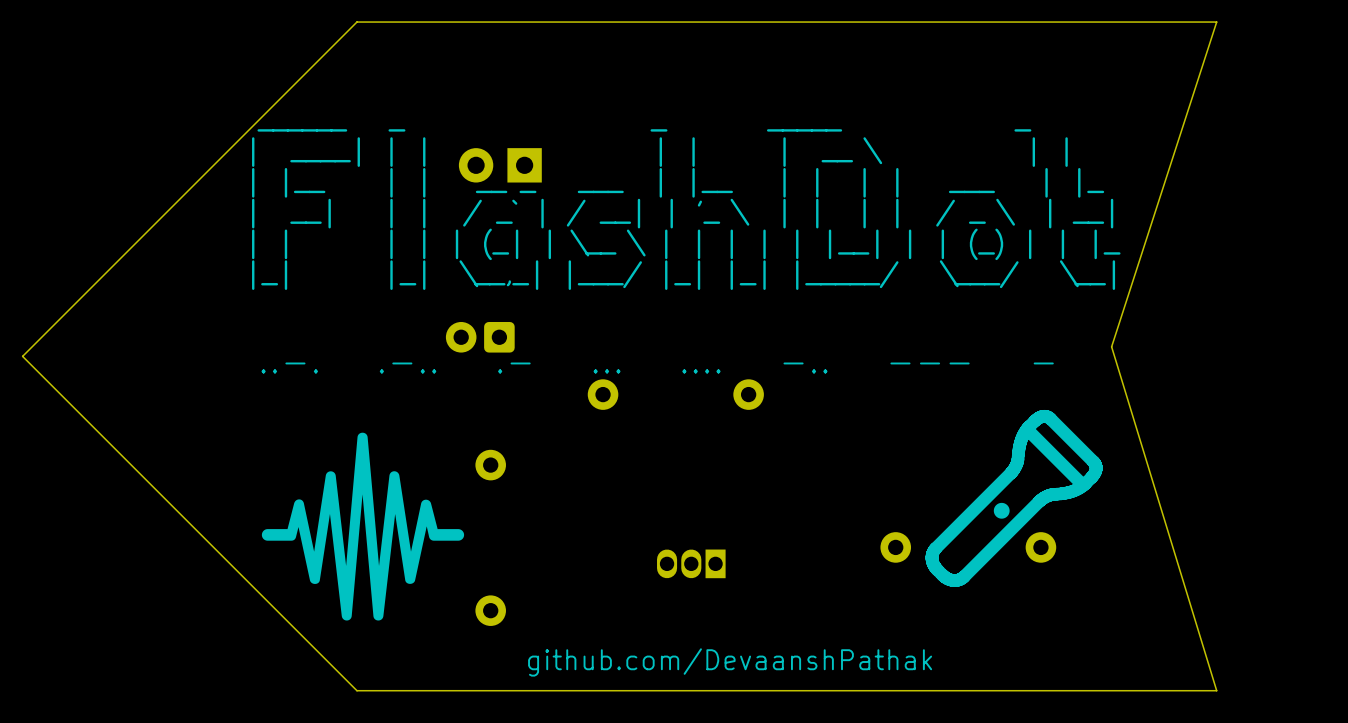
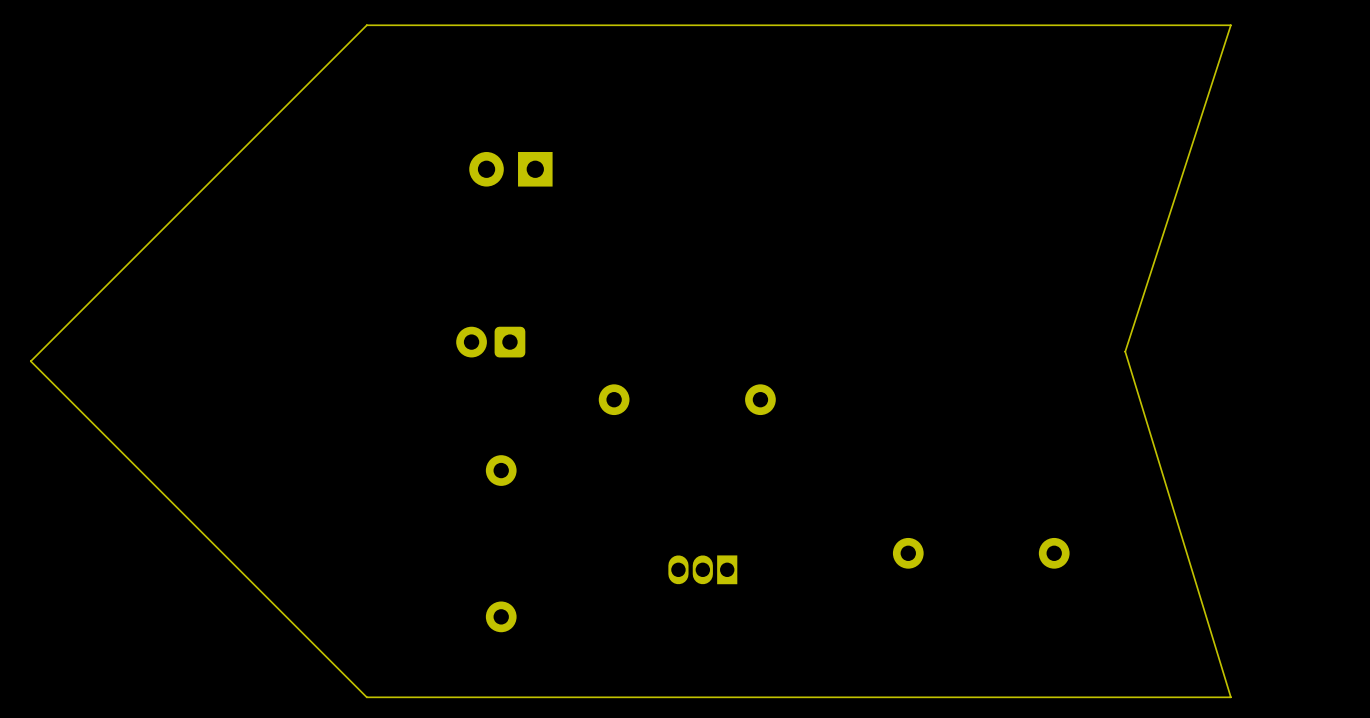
text: ______ _ _ _____ _ (644, 130) -> none
text: | ____| | | | | | __ \ | | (659, 152) -> none
text: | |__ | | __ _ ___ | |__ | | | | ___ | |_ (678, 182) -> none
text: | __| | | / _` | / __| | '_ \ | | | | / _ \ | __| (682, 213) -> none
text: | | | | | (_| | \__ \ | | | | | |__| | | (_) | | |_ (686, 244) -> none
text: |_| |_| \__,_| |___/ |_| |_| |_____/ \___/ \__| (683, 275) -> none
text: ..-. .-.. .- ... .... -.. --- - (657, 368) -> none
line: (1044, 416) (1050, 418) (1093, 462) (1096, 467) (1094, 474) (1075, 489) (1050, 494) (1041, 499) (963, 577) (954, 580) (946, 577) (933, 564) (931, 556) (934, 550) (1011, 472) (1017, 462) (1019, 444) (1025, 432) (1036, 419) (1044, 416) -> none
line: (1027, 429) (1083, 485) -> none
drawing: [261, 432, 465, 621] -> none
drawing: [993, 502, 1010, 519] -> none
text: github.com/DevaanshPathak (730, 662) -> none

